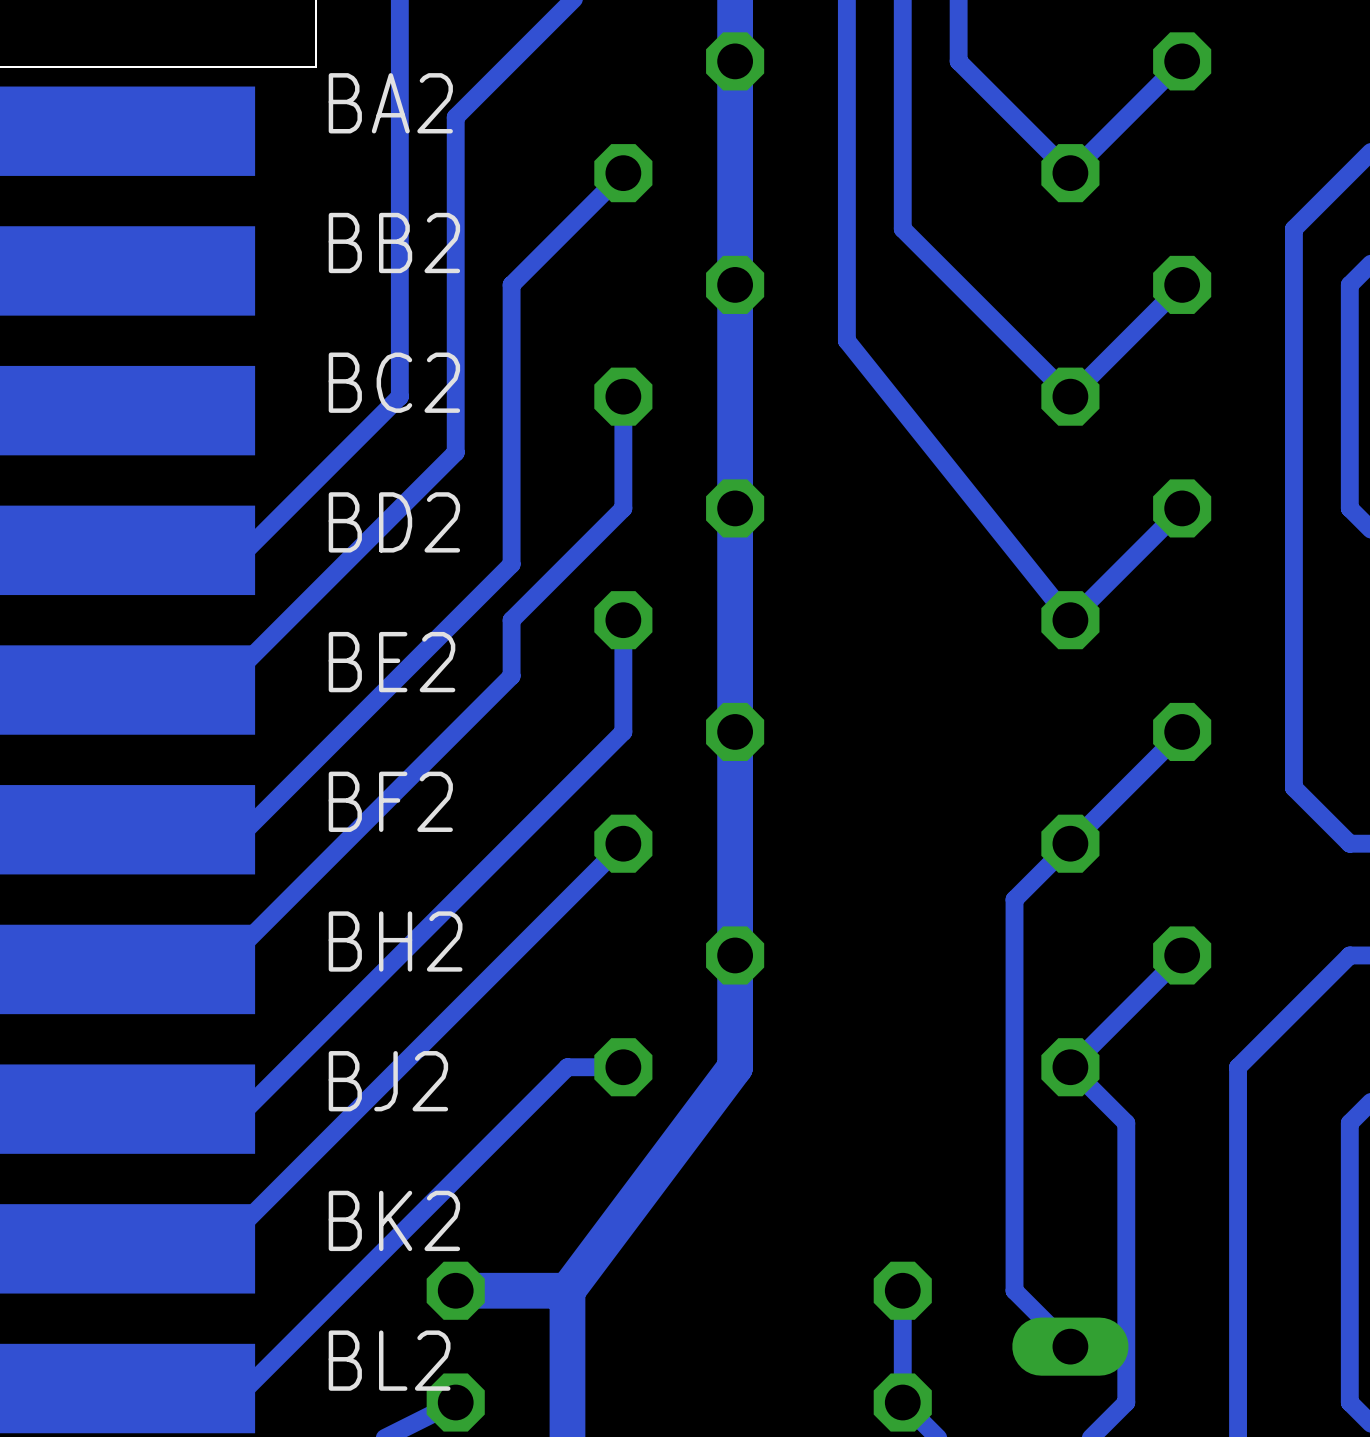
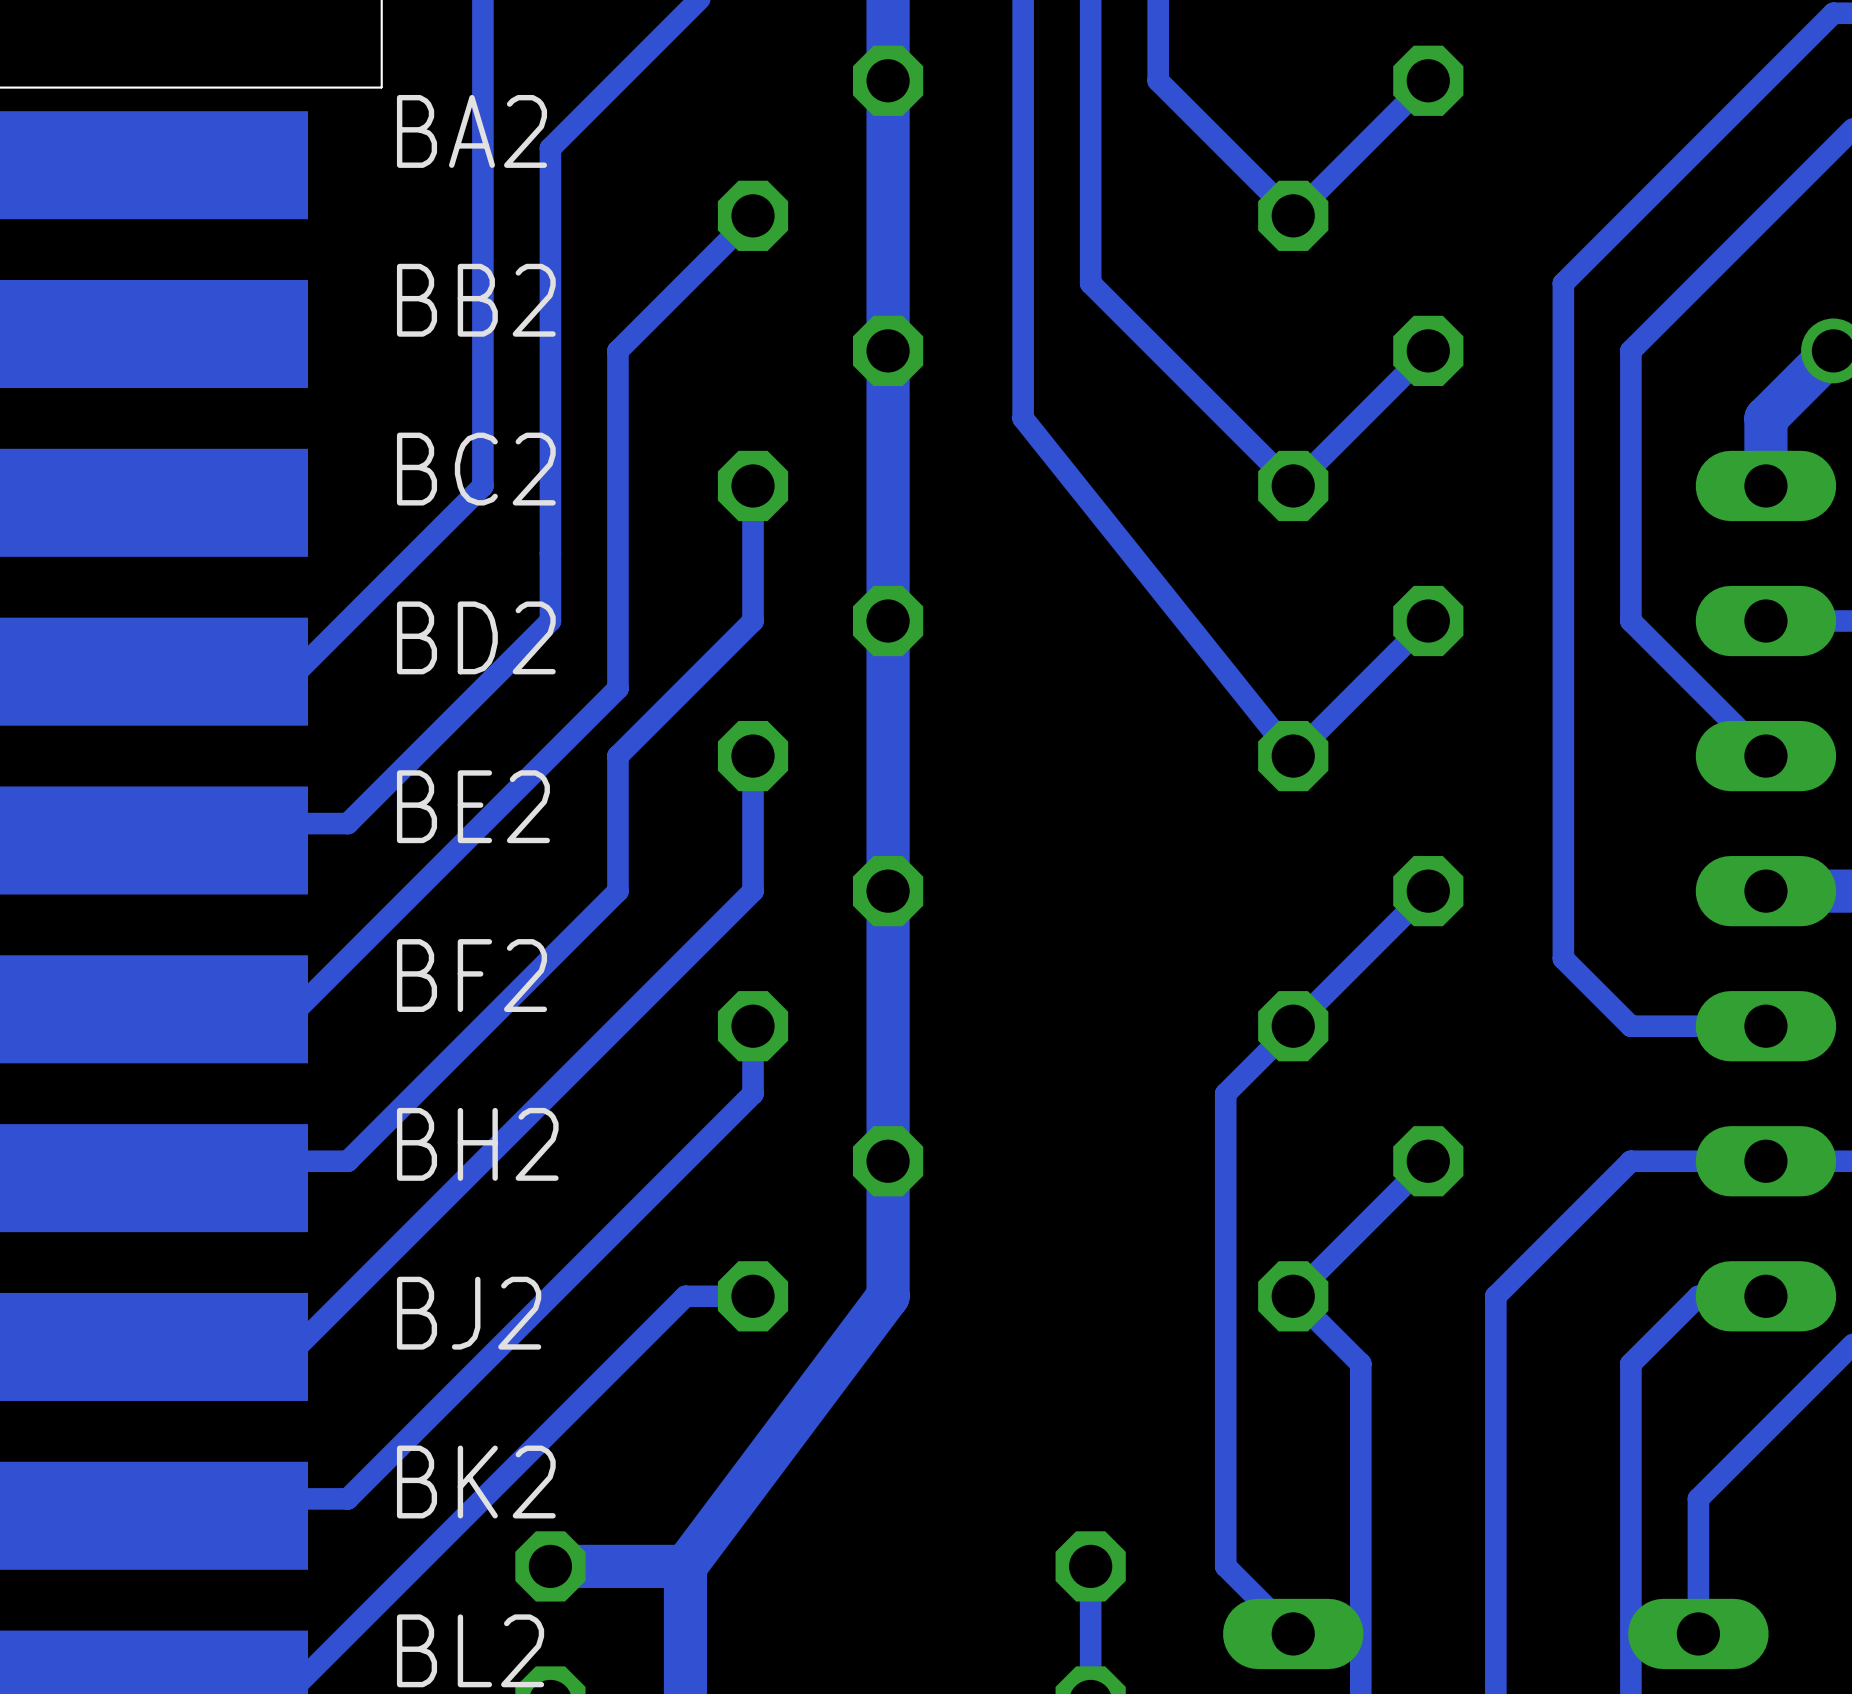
track: (455, 452) (232, 676) -> (550, 553) (550, 621) (347, 823) (280, 823)
track: (511, 676) (232, 955) -> (617, 823) (617, 891) (347, 1161) (280, 1161)
track: (623, 843) (232, 1234) -> (753, 1026) (753, 1093) (347, 1498) (280, 1498)

